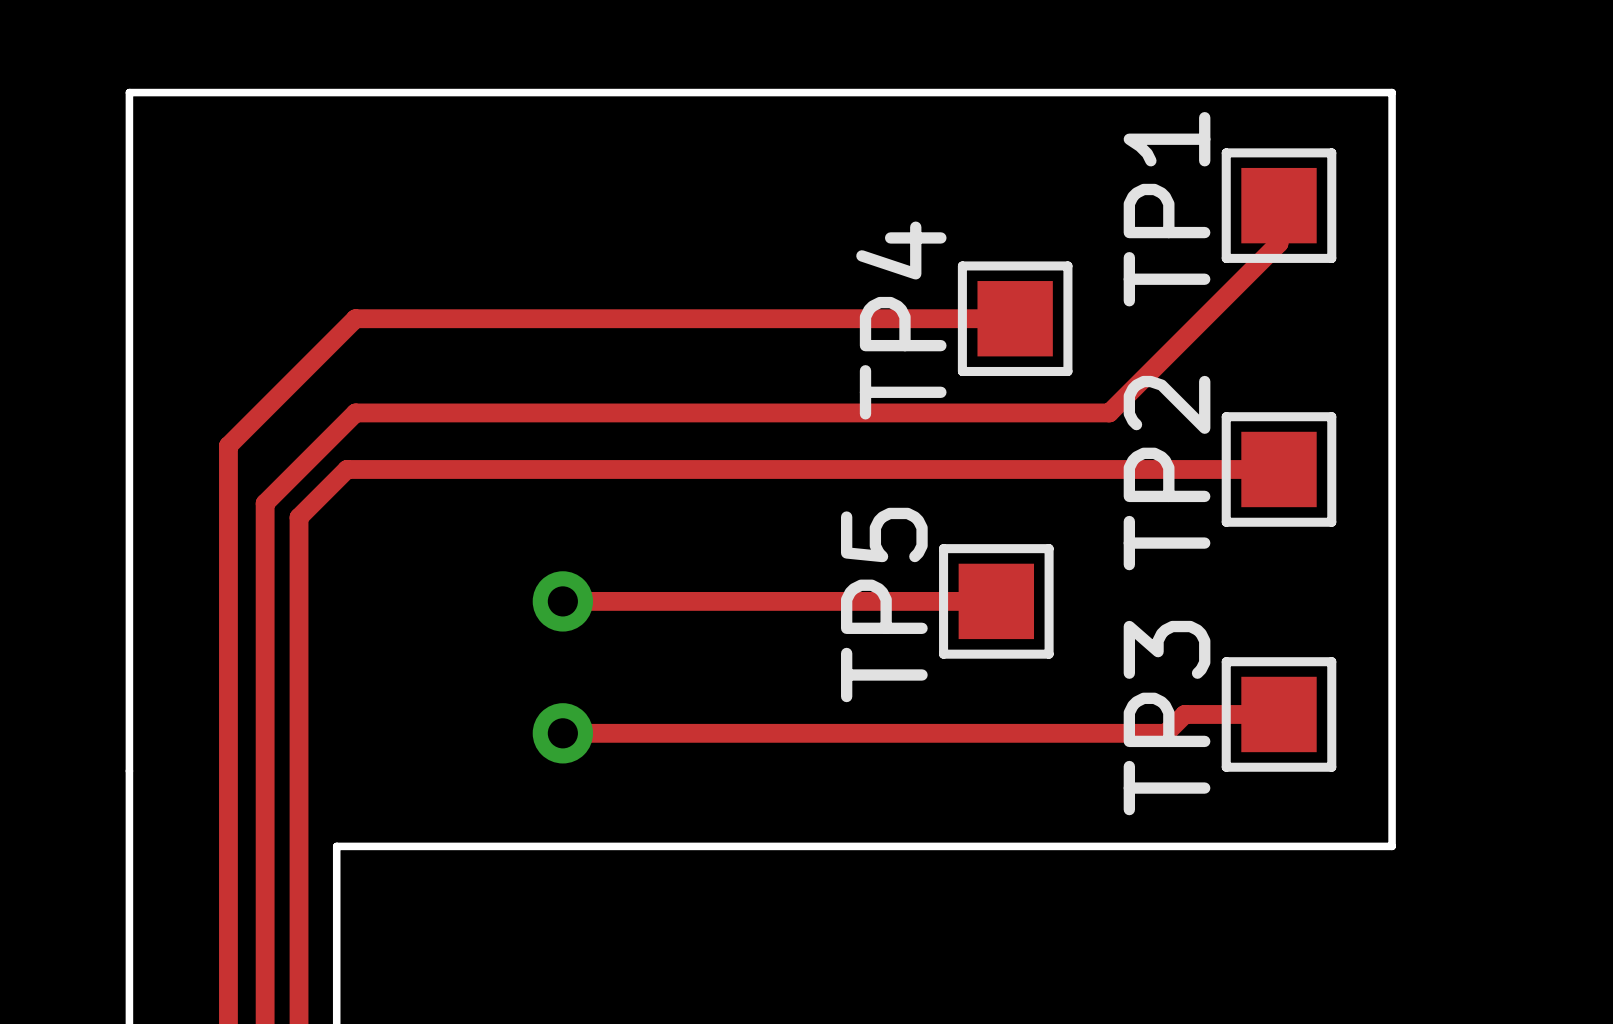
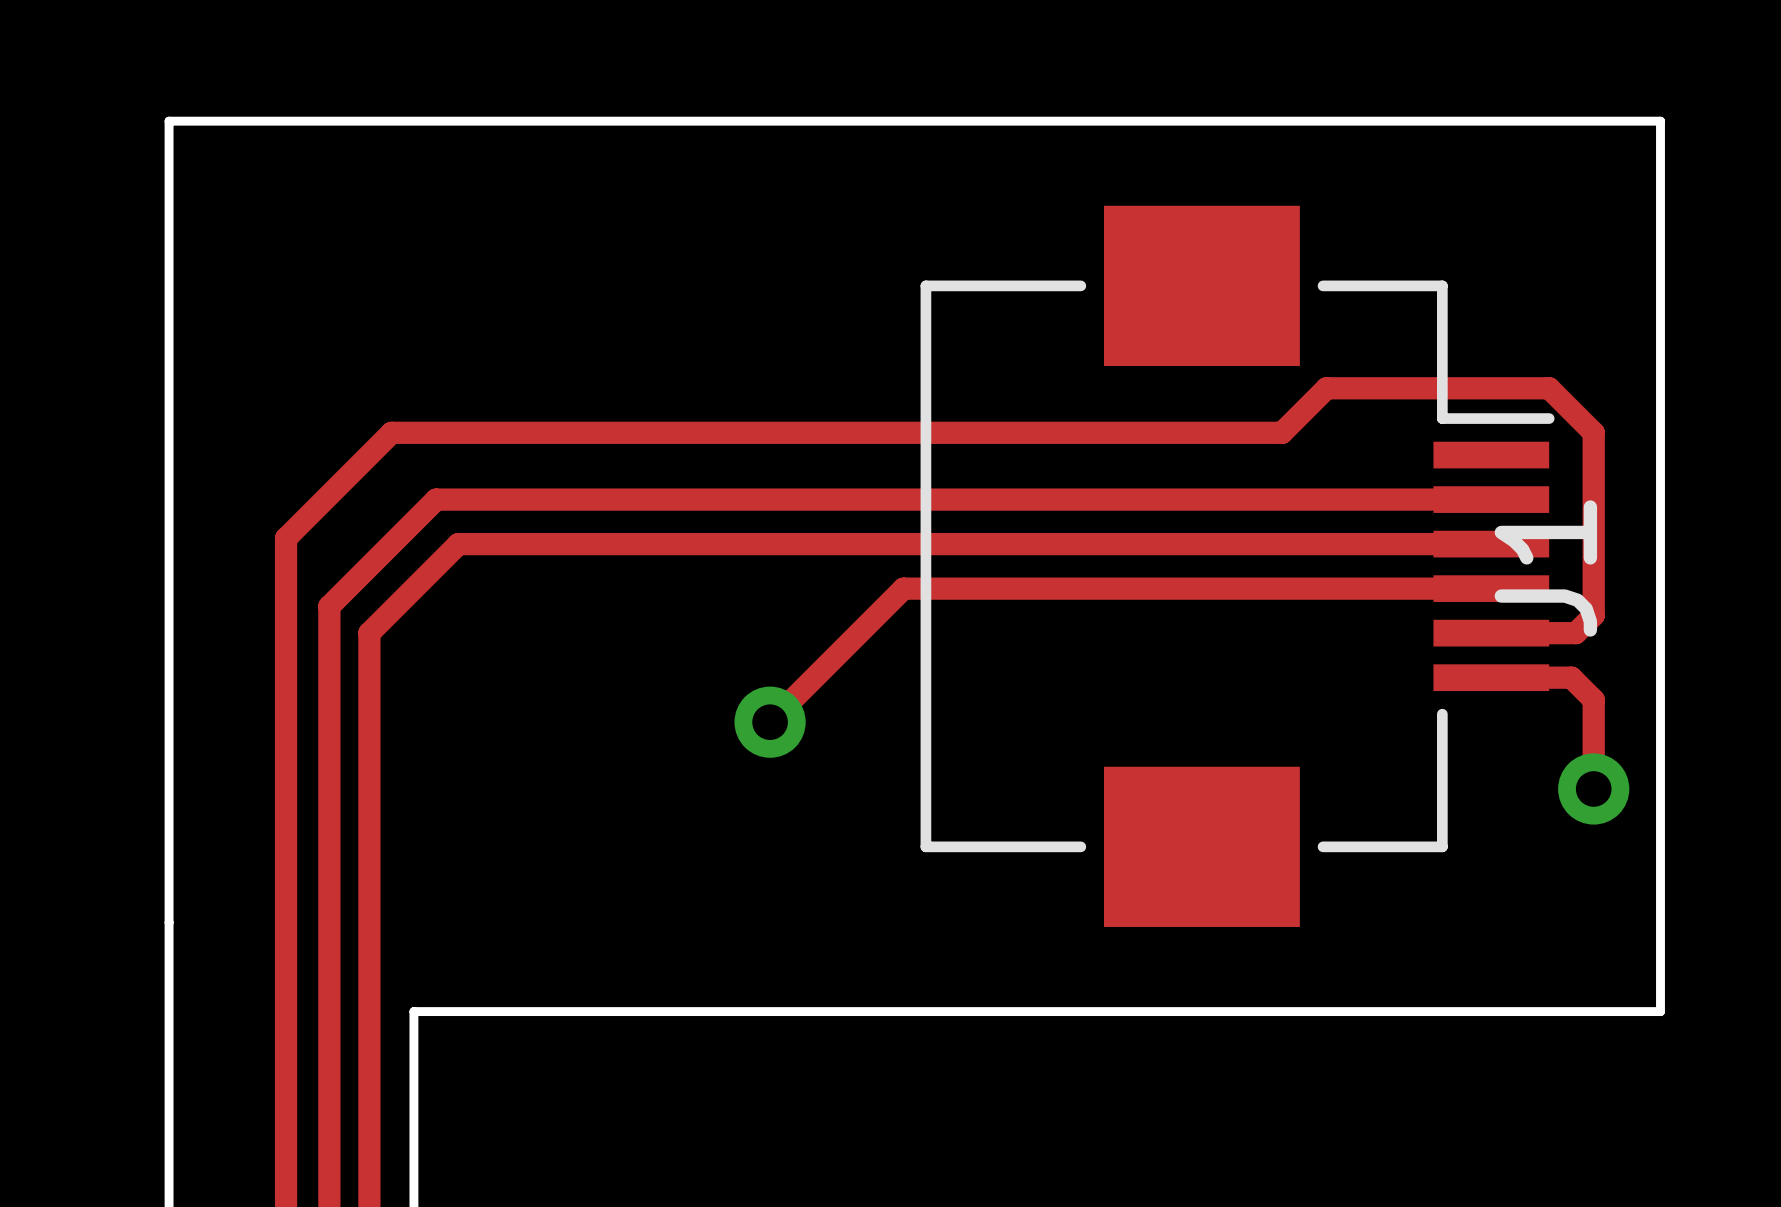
track: (1279, 186) (1279, 243) (1109, 412) -> (1491, 499) (1326, 499)
TP1: (1279, 205) -> none
track: (1015, 318) (355, 318) (317, 356) -> (1491, 633) (1575, 633) (1593, 615) (1593, 432) (1549, 388) (1326, 388) (1282, 432) (391, 432)
TP4: (1015, 318) -> none
J1: none -> (1237, 566)
track: (1279, 469) (346, 469) (299, 517) (299, 526) -> (1491, 544) (458, 544) (369, 633)
TP2: (1279, 469) -> none
track: none -> (1491, 588) (903, 588) (770, 722)
track: none -> (1491, 677) (1571, 677) (1593, 699) (1593, 788)
track: (562, 601) (996, 601) -> none
via: (562, 601) -> none
via: none -> (770, 722)
TP5: (996, 601) -> none
via: none -> (1593, 788)
track: (1279, 714) (1184, 714) (1165, 733) (562, 733) -> none
TP3: (1279, 714) -> none
via: (562, 733) -> none

